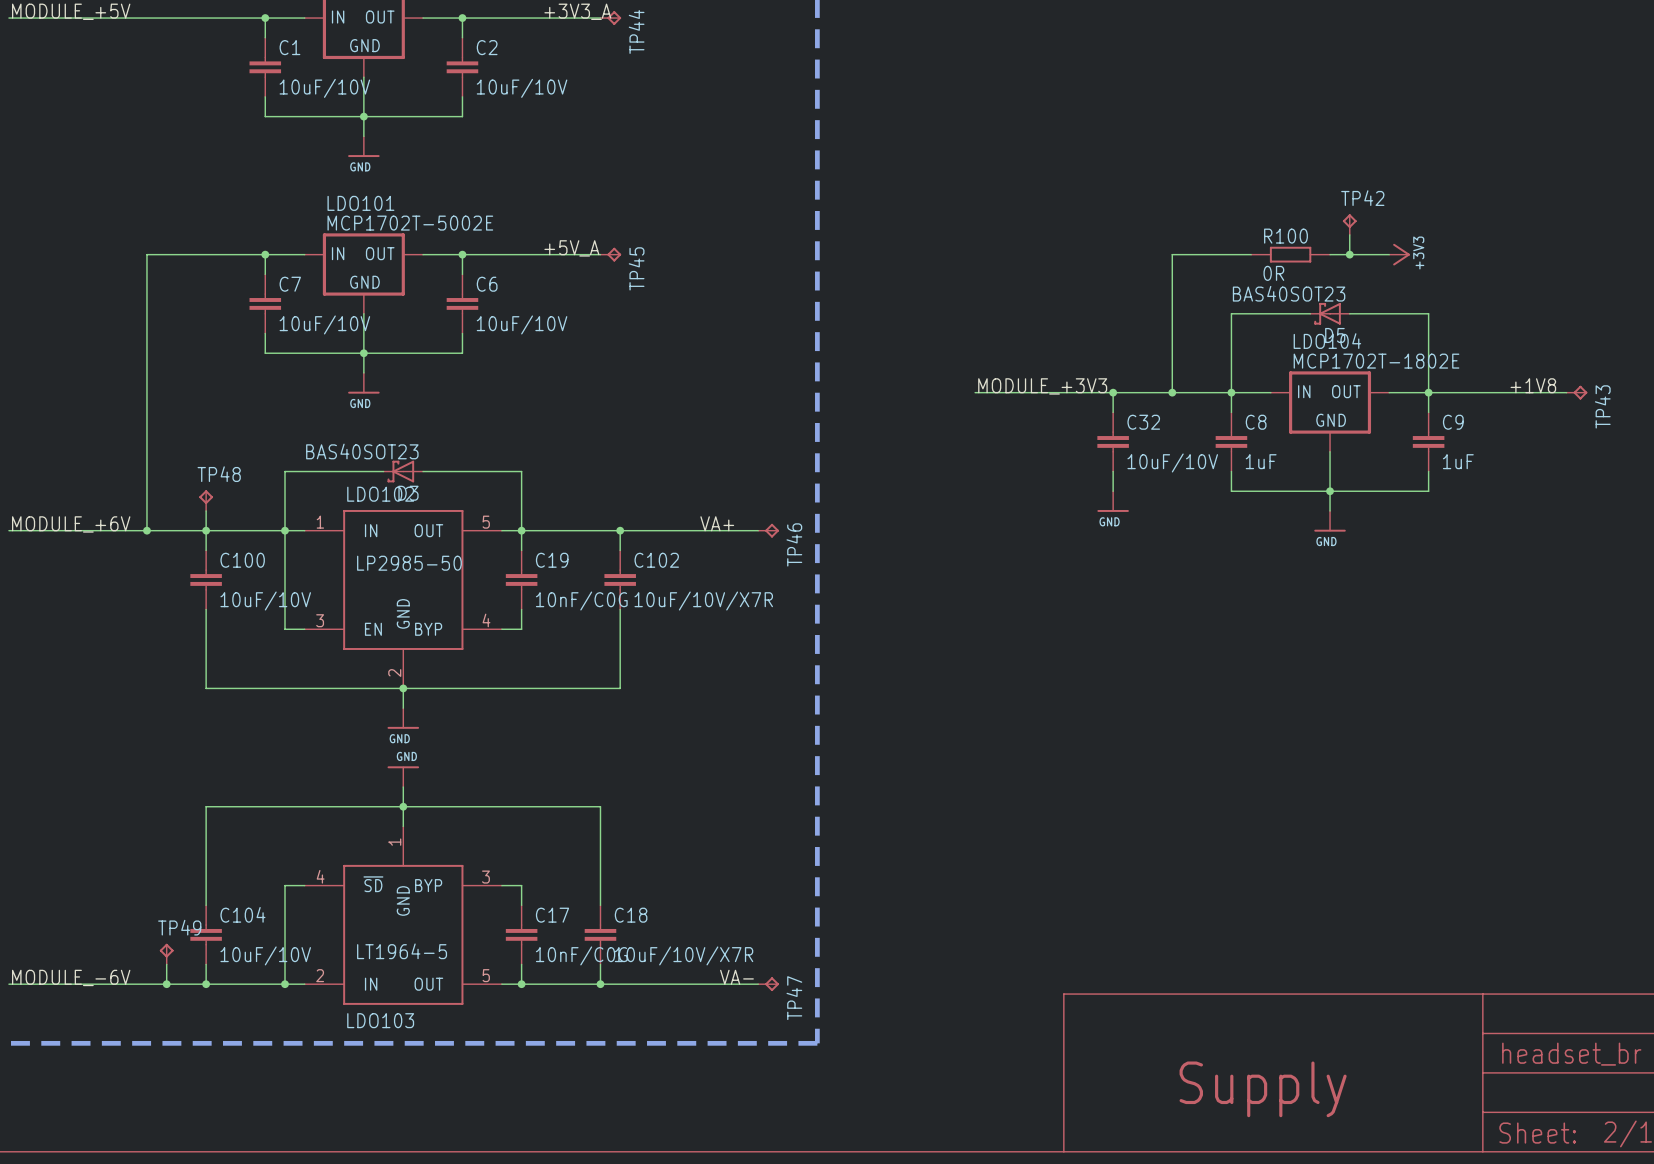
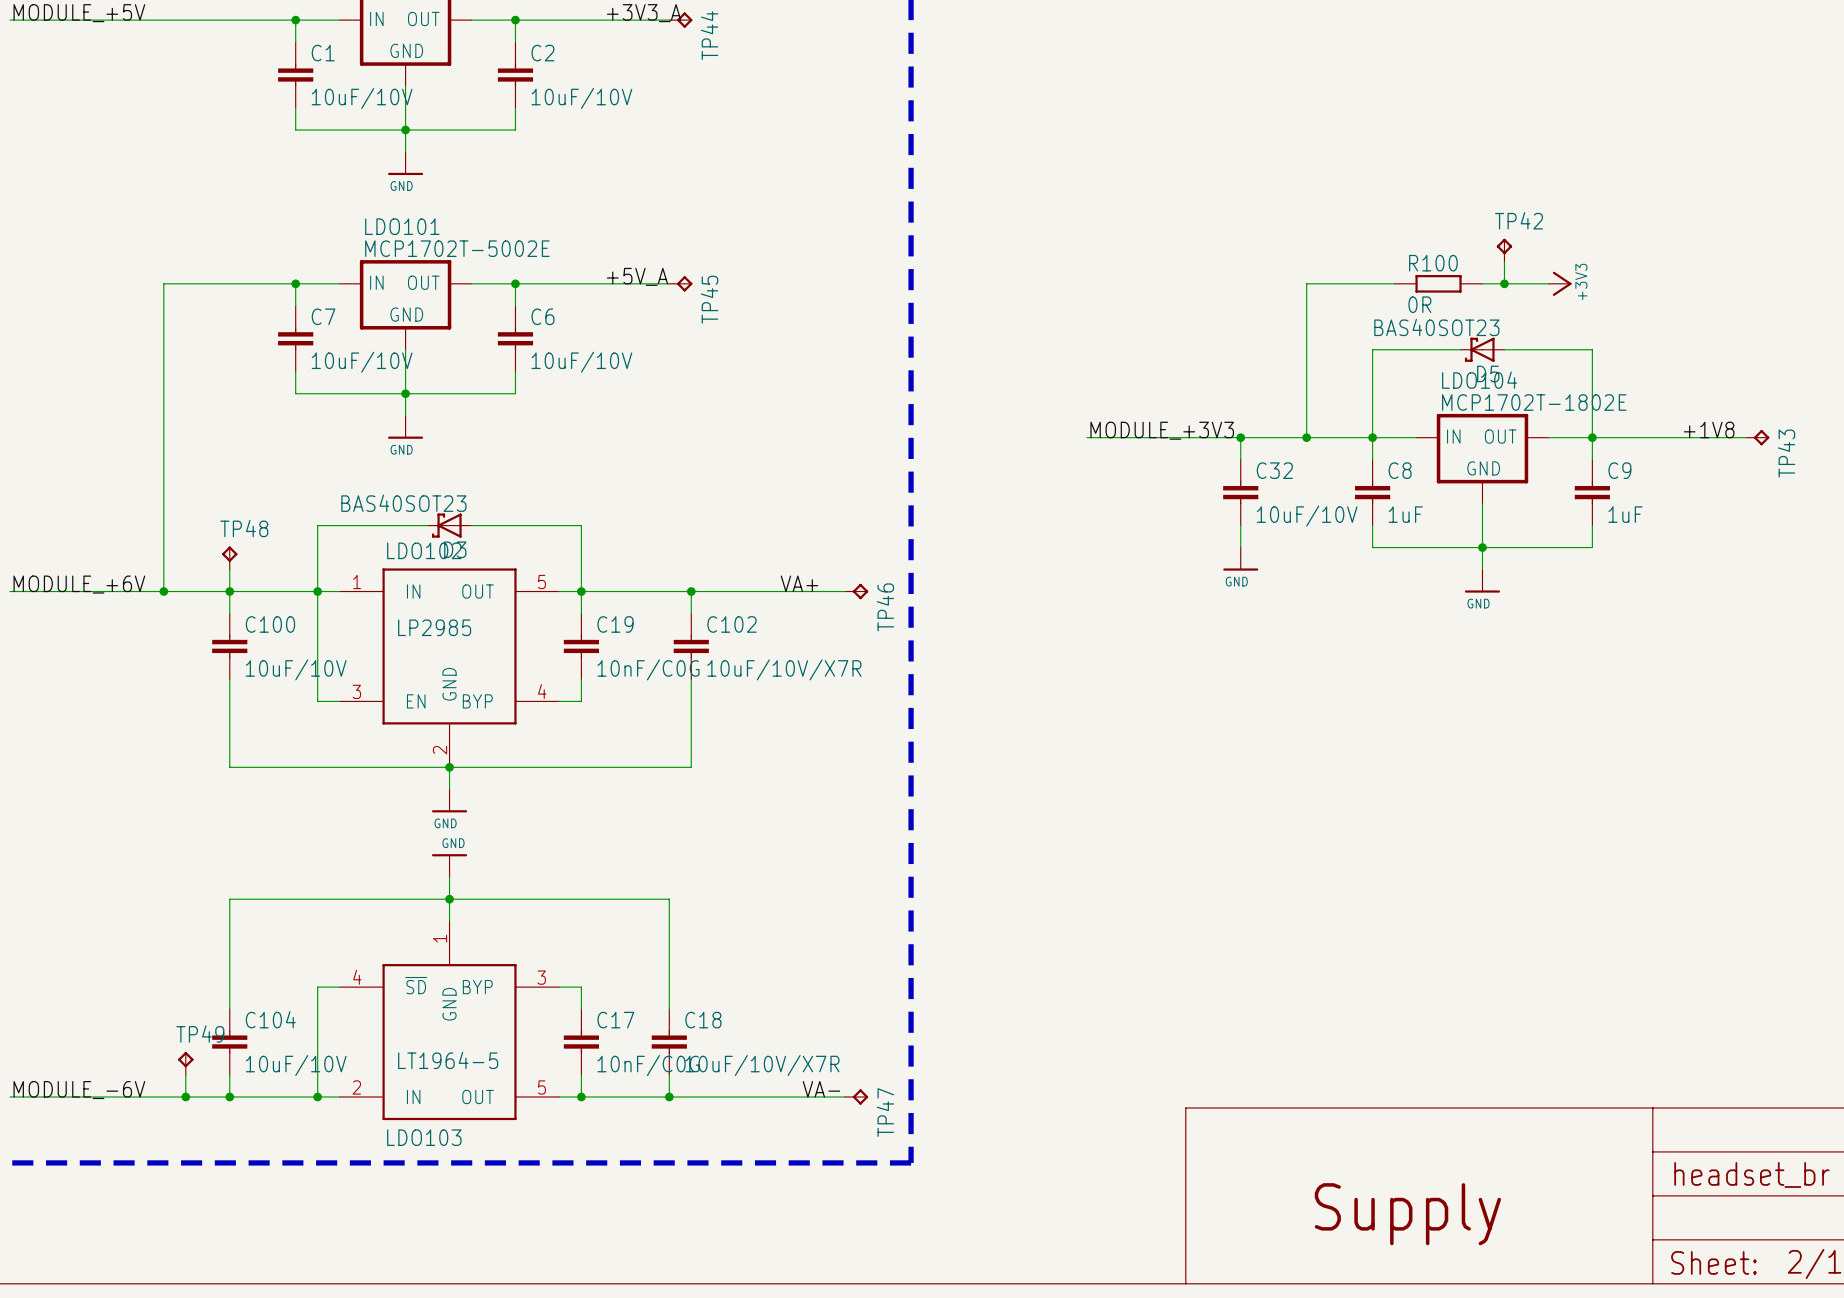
LDO102 value: LP2985-50 (409, 563) -> LP2985 (434, 627)

